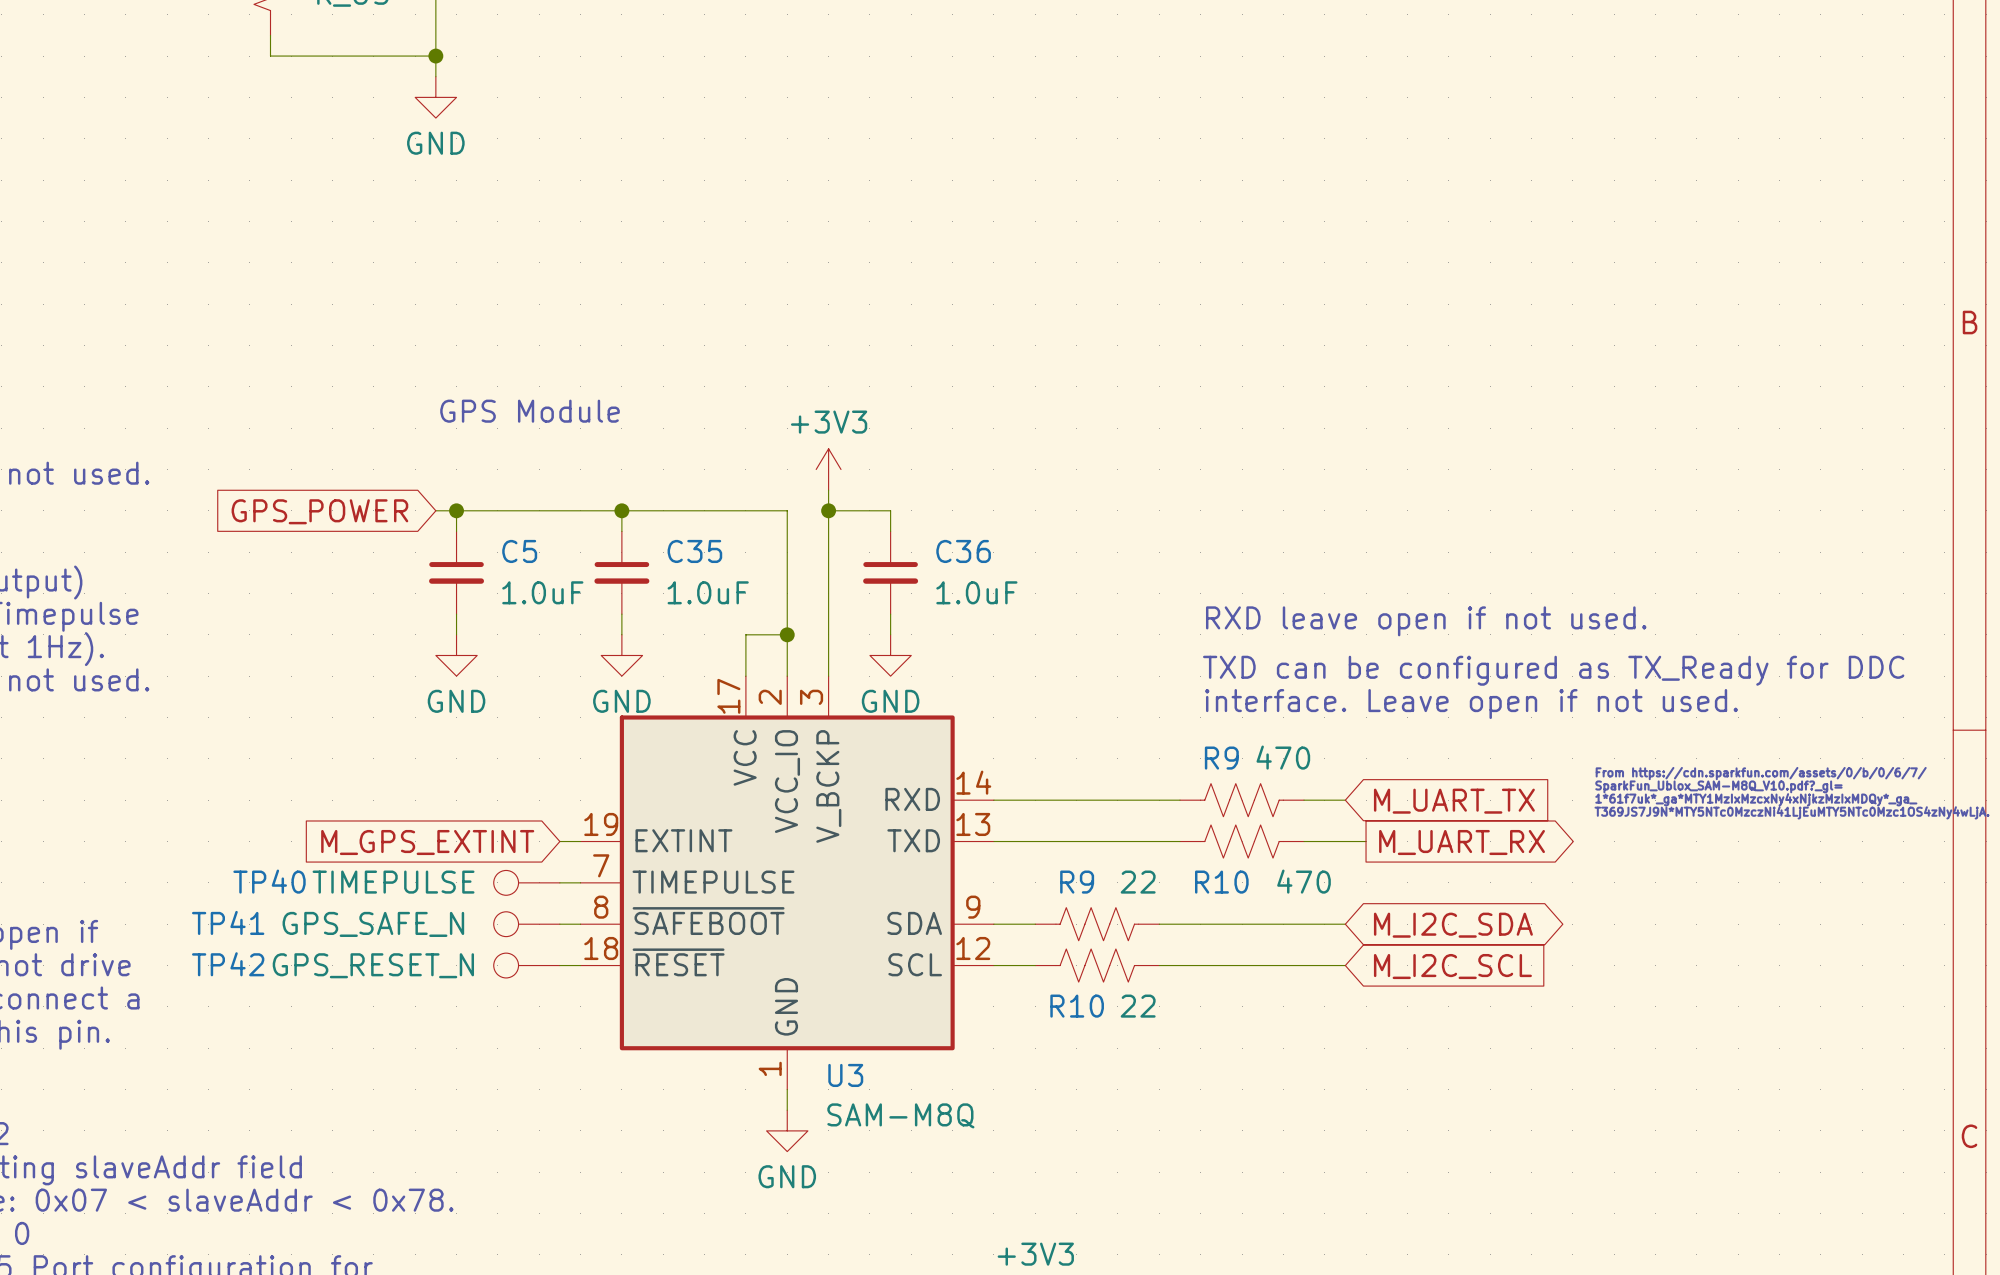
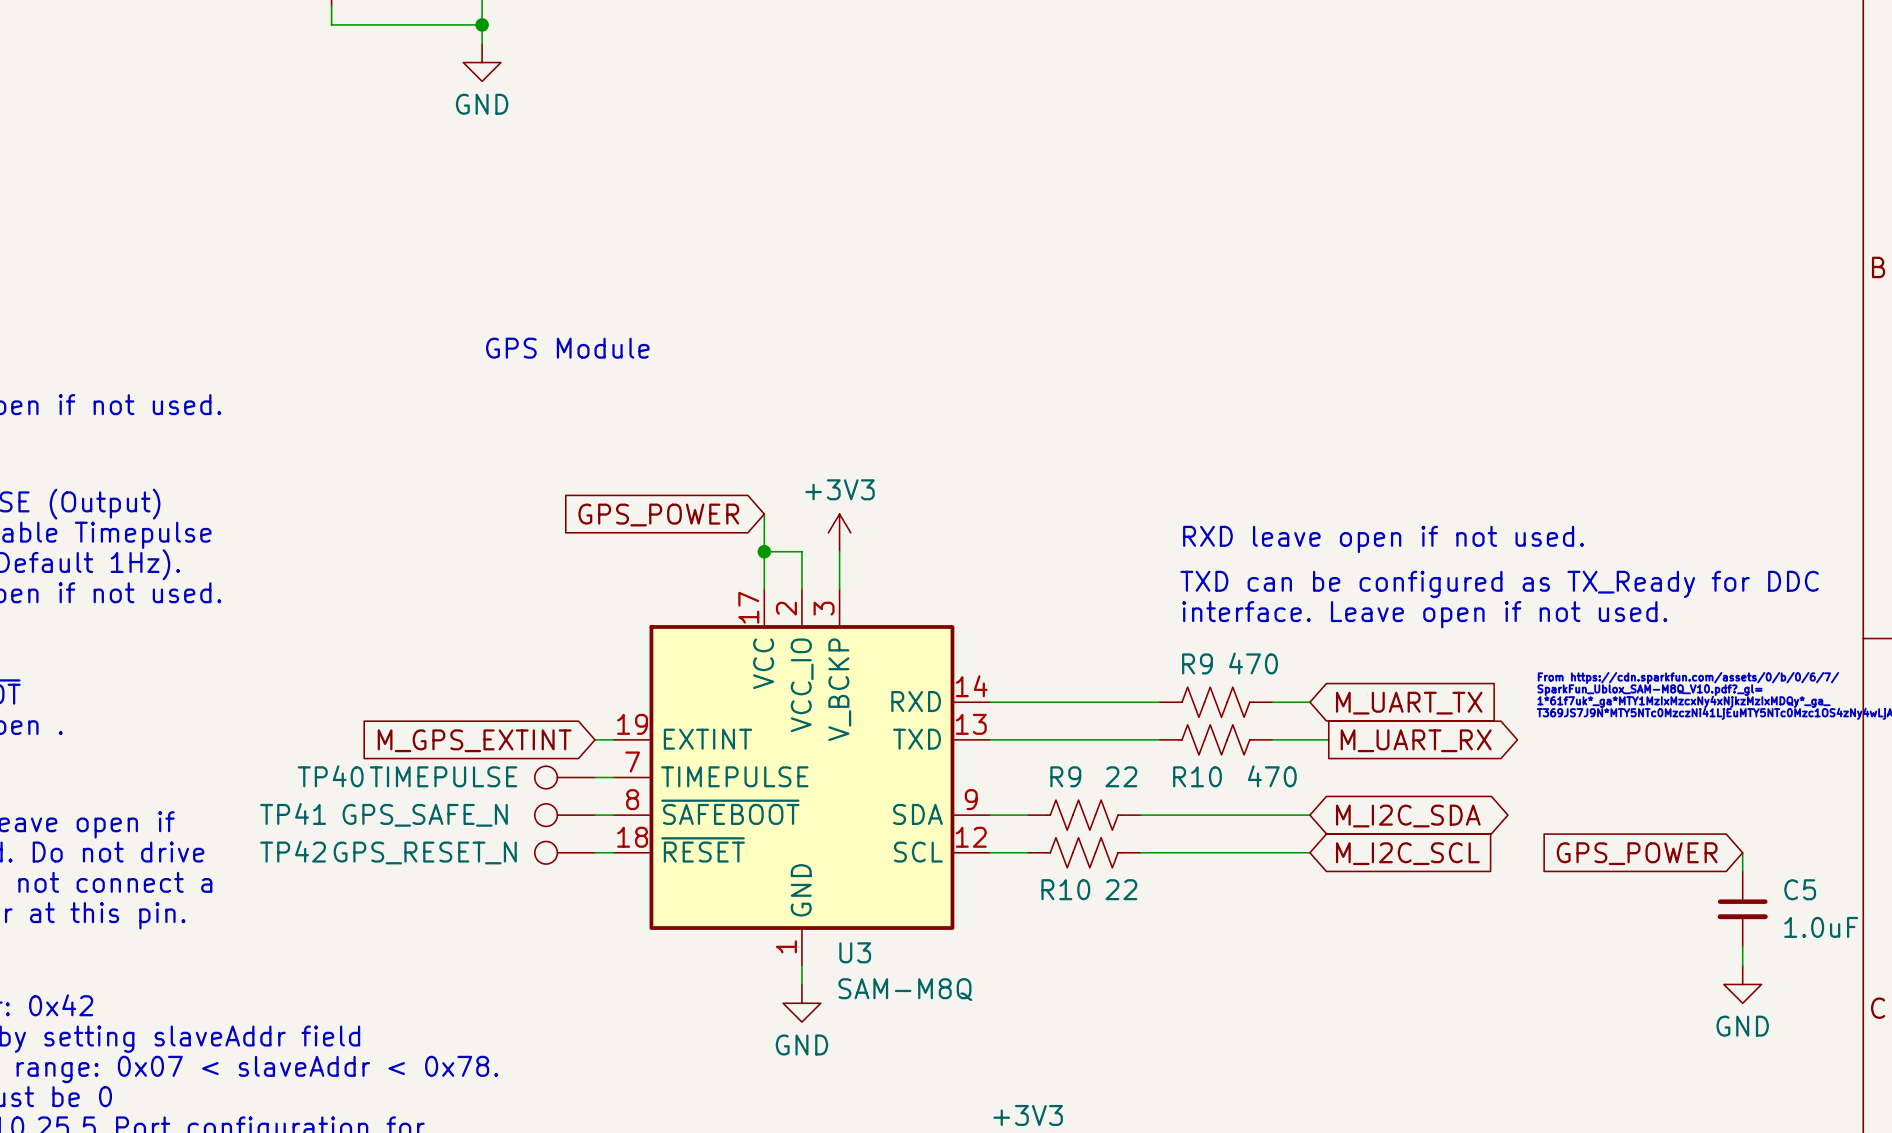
power symbol position: +3V3 (828, 469) -> +3V3 (839, 532)
wire: (828, 490) (828, 634) -> none
wire: (435, 510) (787, 510) (787, 634) -> none
wire: (456, 510) (456, 531) -> none
junction: (456, 510) -> none
wire: (621, 510) (621, 531) -> none
junction: (621, 510) -> none
wire: (828, 510) (890, 510) (890, 531) -> none
junction: (828, 510) -> none
global label position: GPS_POWER (319, 511) -> GPS_POWER (658, 514)
C5 position: (456, 572) -> (1742, 909)
C35: 1.0uF (621, 572) -> none
C36: 1.0uF (890, 572) -> none
wire: none -> (764, 514) (764, 551)
wire: (456, 614) (456, 634) -> none
wire: (621, 614) (621, 634) -> none
wire: (890, 614) (890, 634) -> none
junction position: (787, 634) -> (764, 551)
power symbol: GND (456, 655) -> none
power symbol: GND (621, 655) -> none
power symbol: GND (890, 655) -> none
wire: none -> (1742, 852) (1742, 871)
global label: none -> GPS_POWER (1637, 853)
wire: none -> (1742, 946) (1742, 965)
power symbol: none -> GND (1742, 984)

